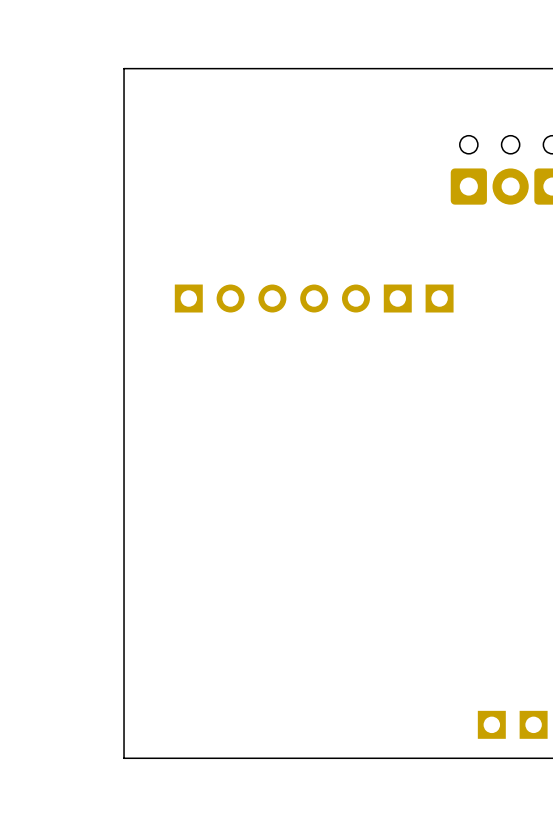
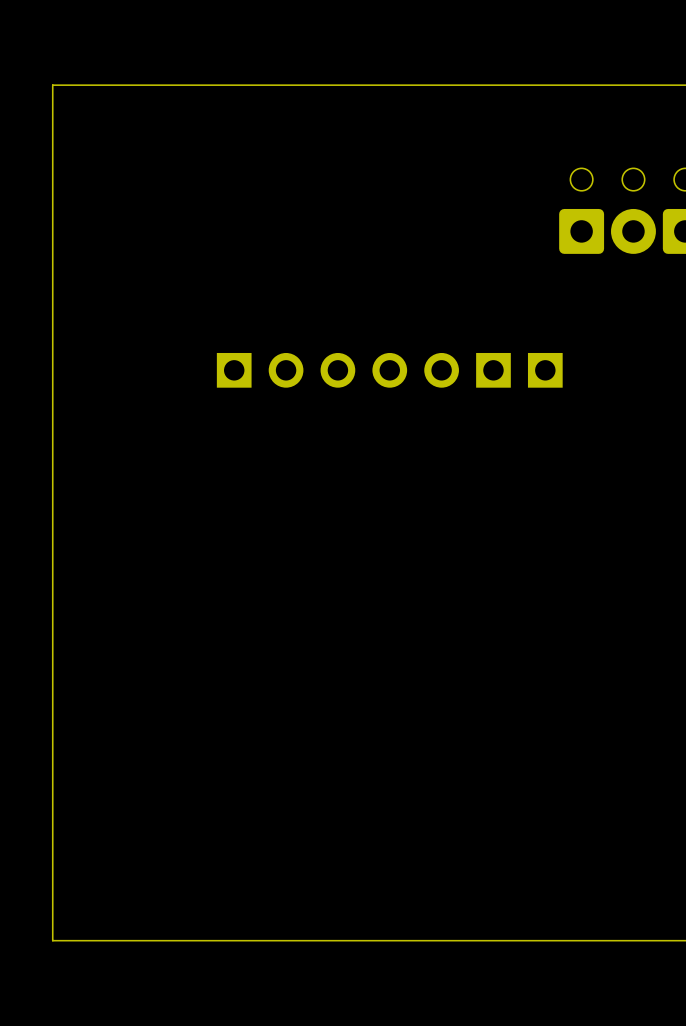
board edge: (124, 68) (124, 758) -> (153, 85) (52, 85) (52, 940) (153, 940)
part: (491, 724) -> none
part: (533, 724) -> none

